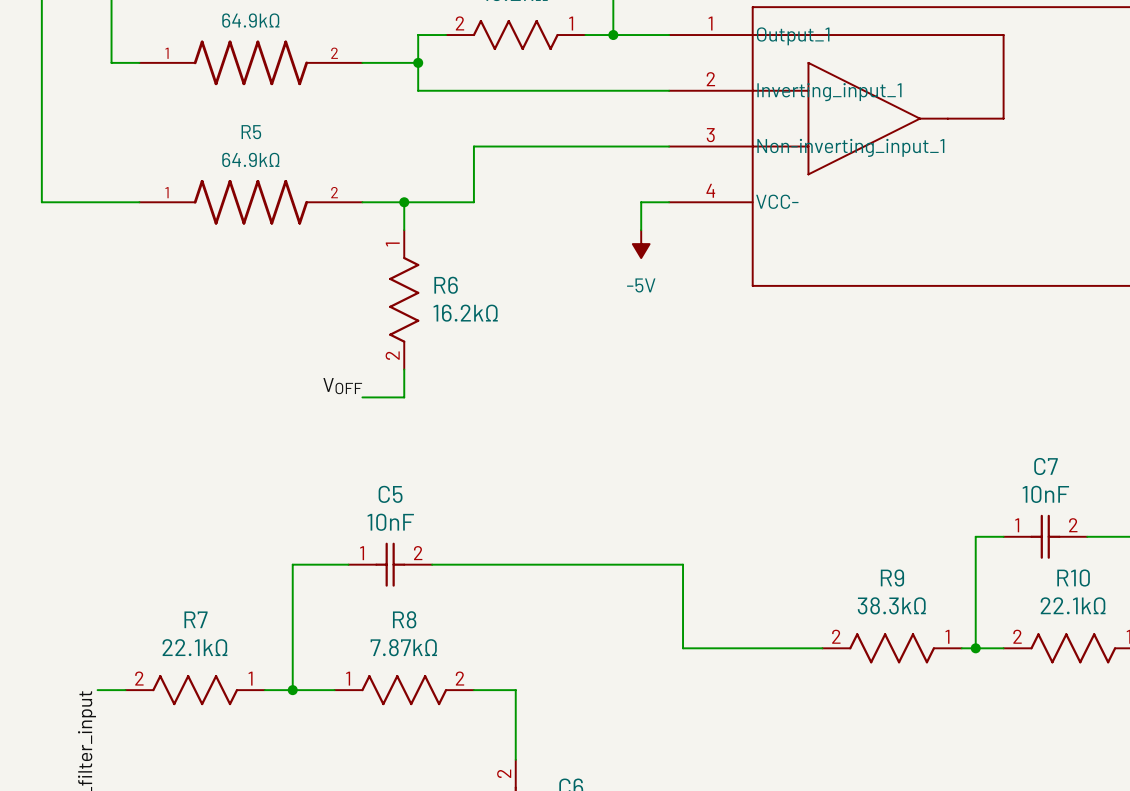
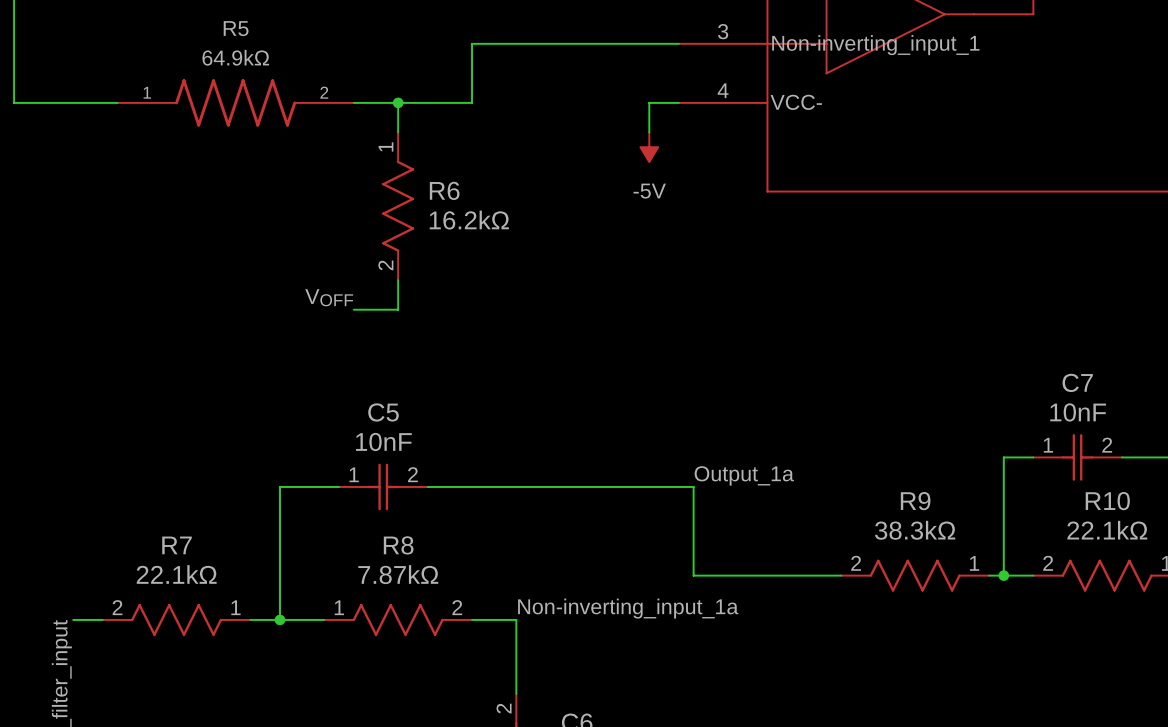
label: none -> Output_1a (744, 475)
label: none -> Non-inverting_input_1a (628, 608)

